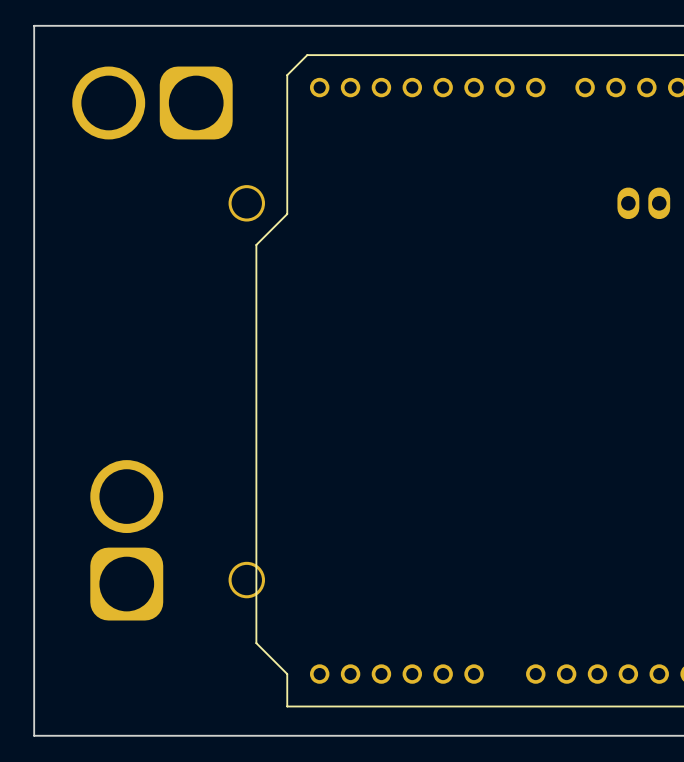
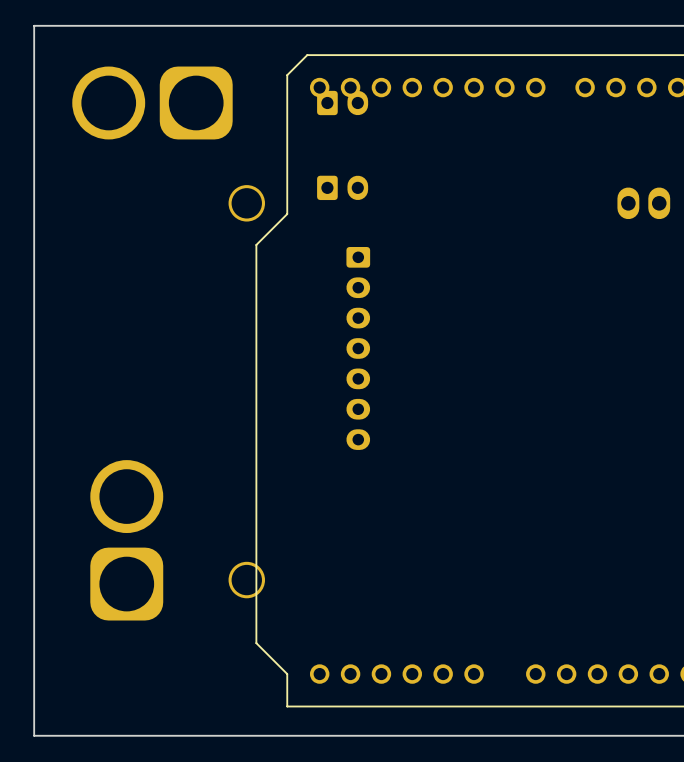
part: none -> (342, 102)
part: none -> (342, 187)
part: none -> (358, 348)

